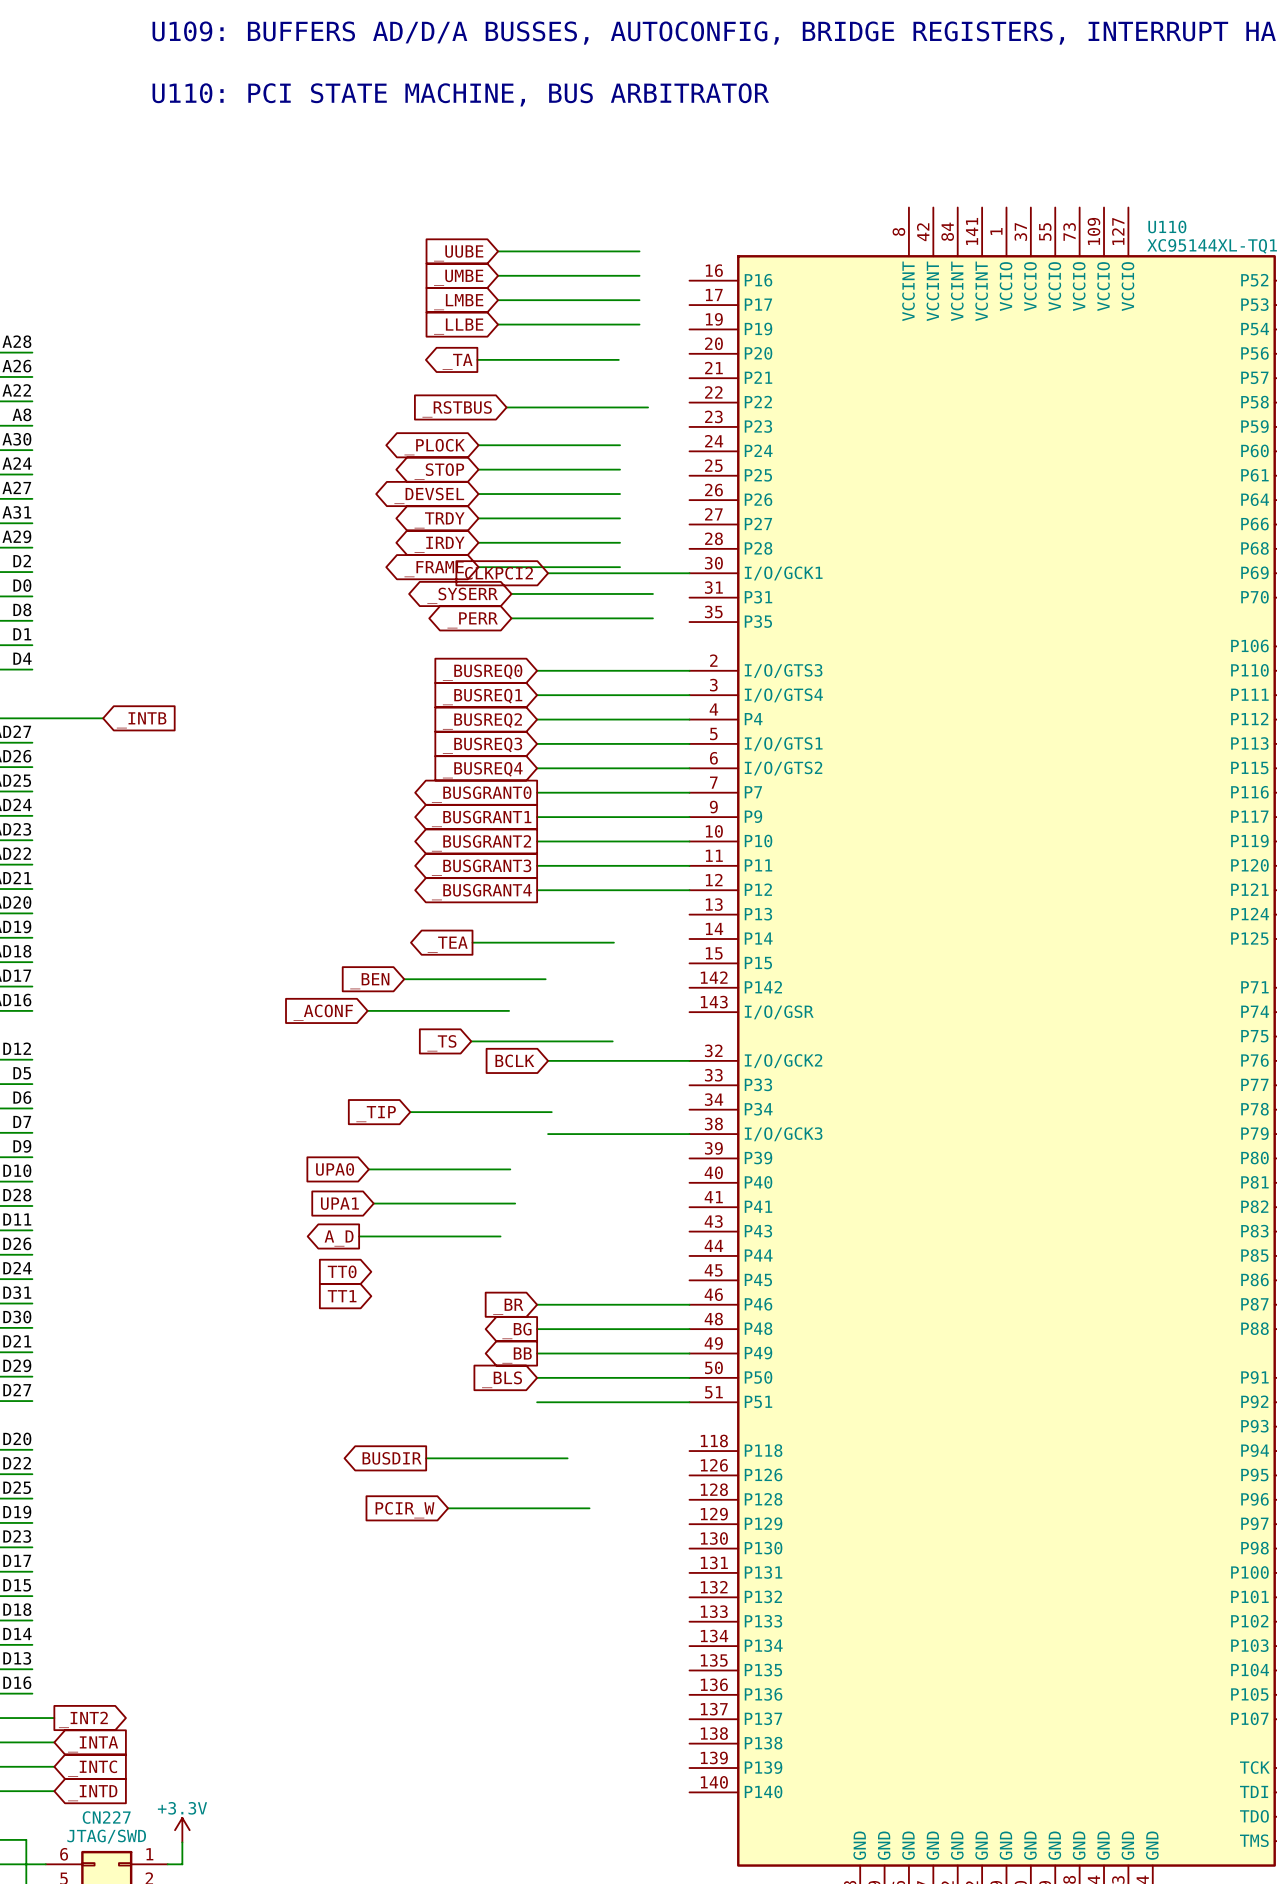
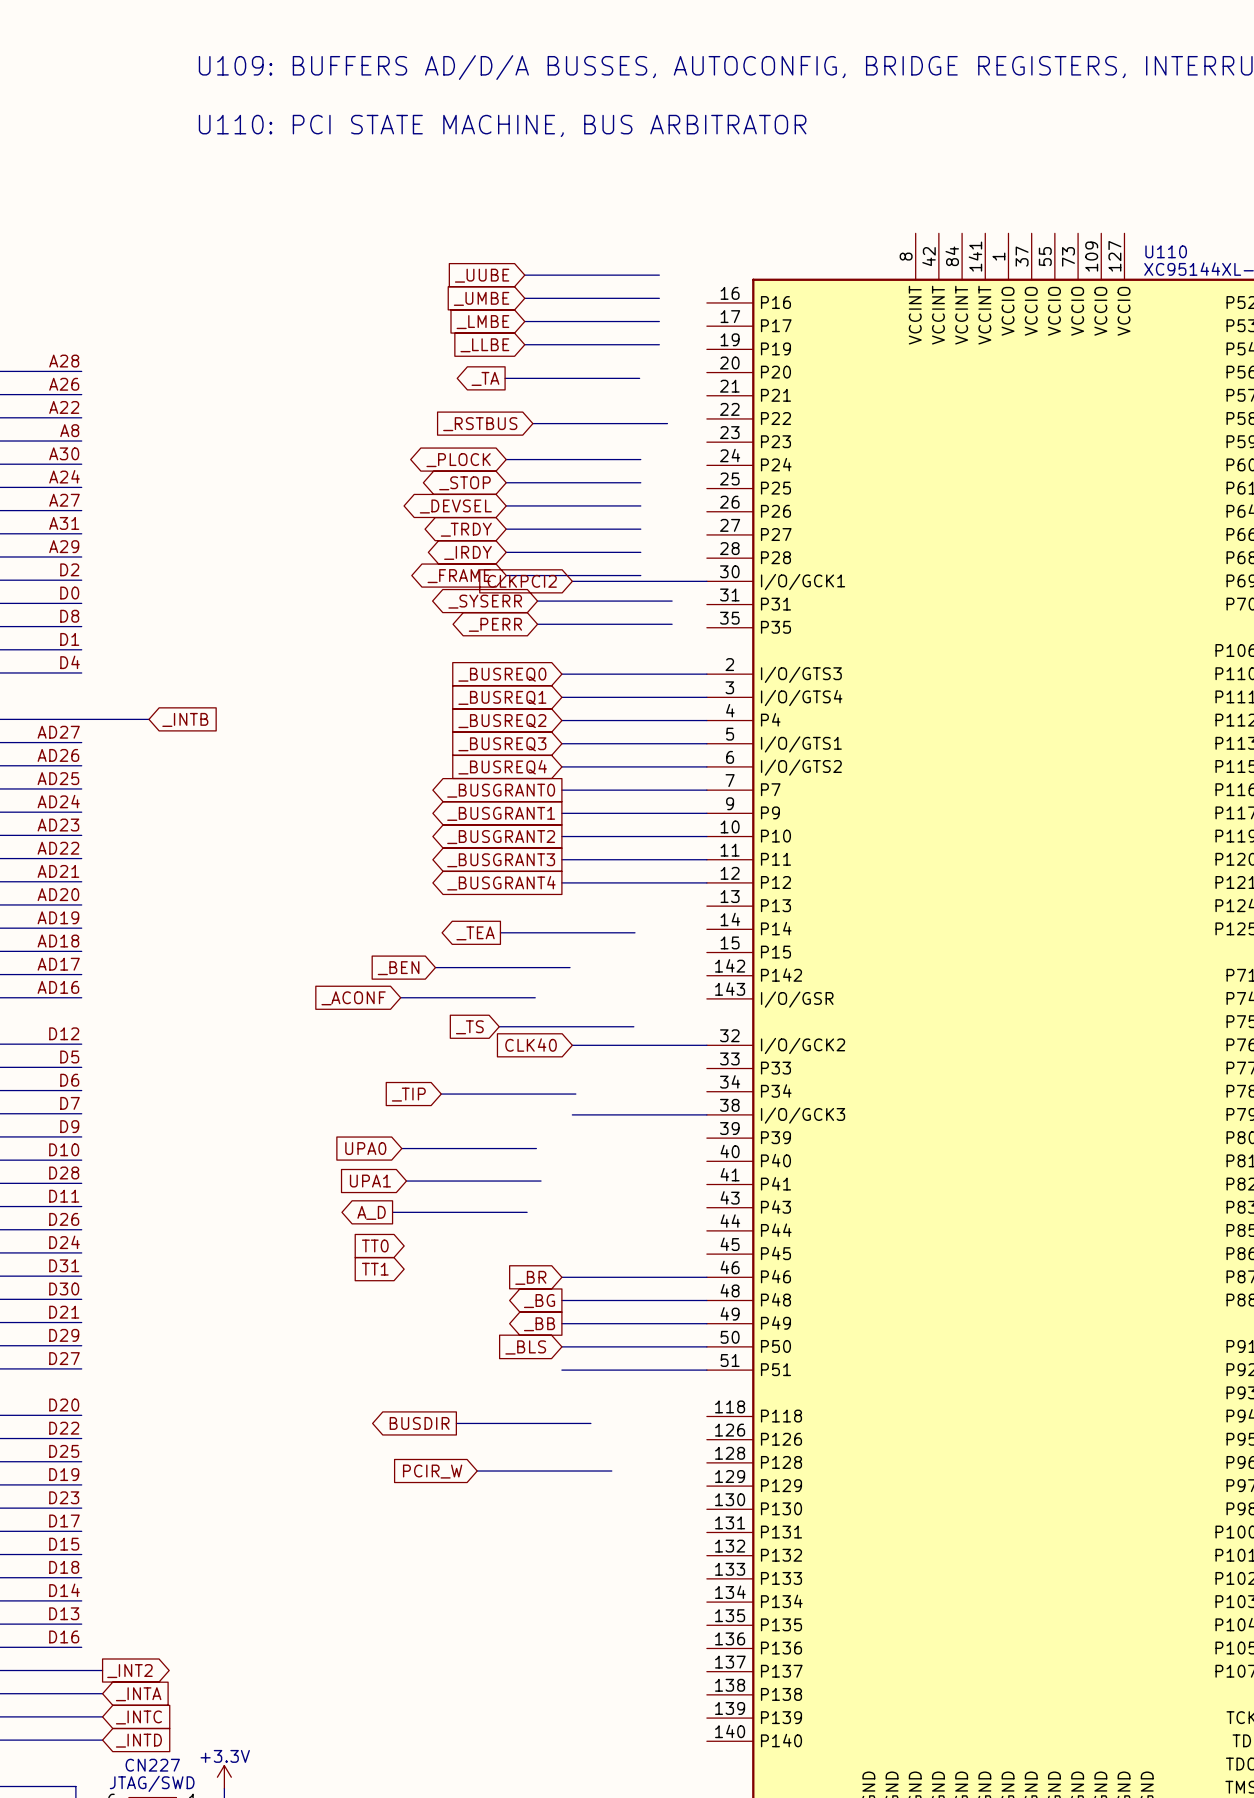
global label: BCLK (514, 1060) -> CLK40 (531, 1045)

